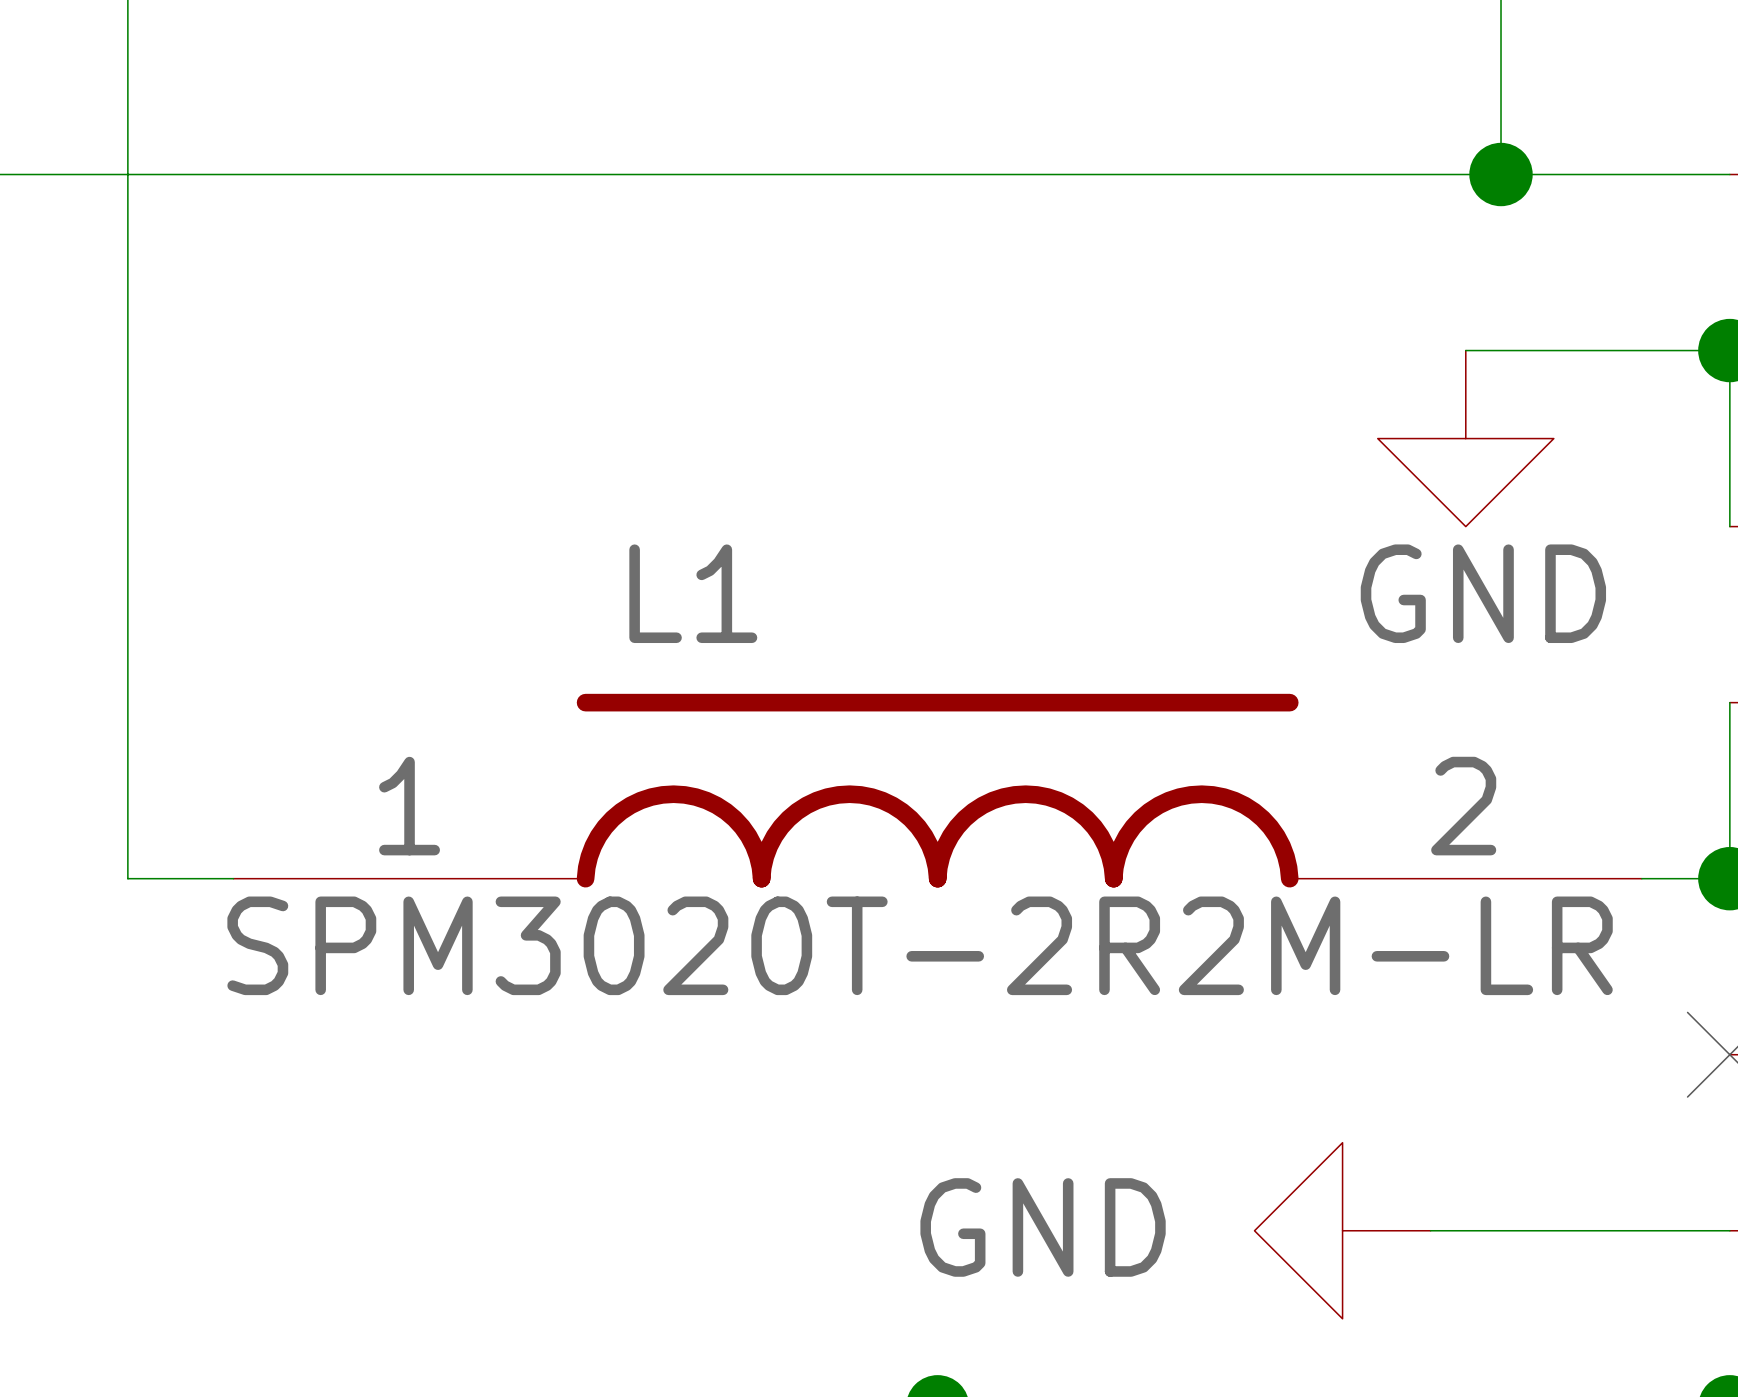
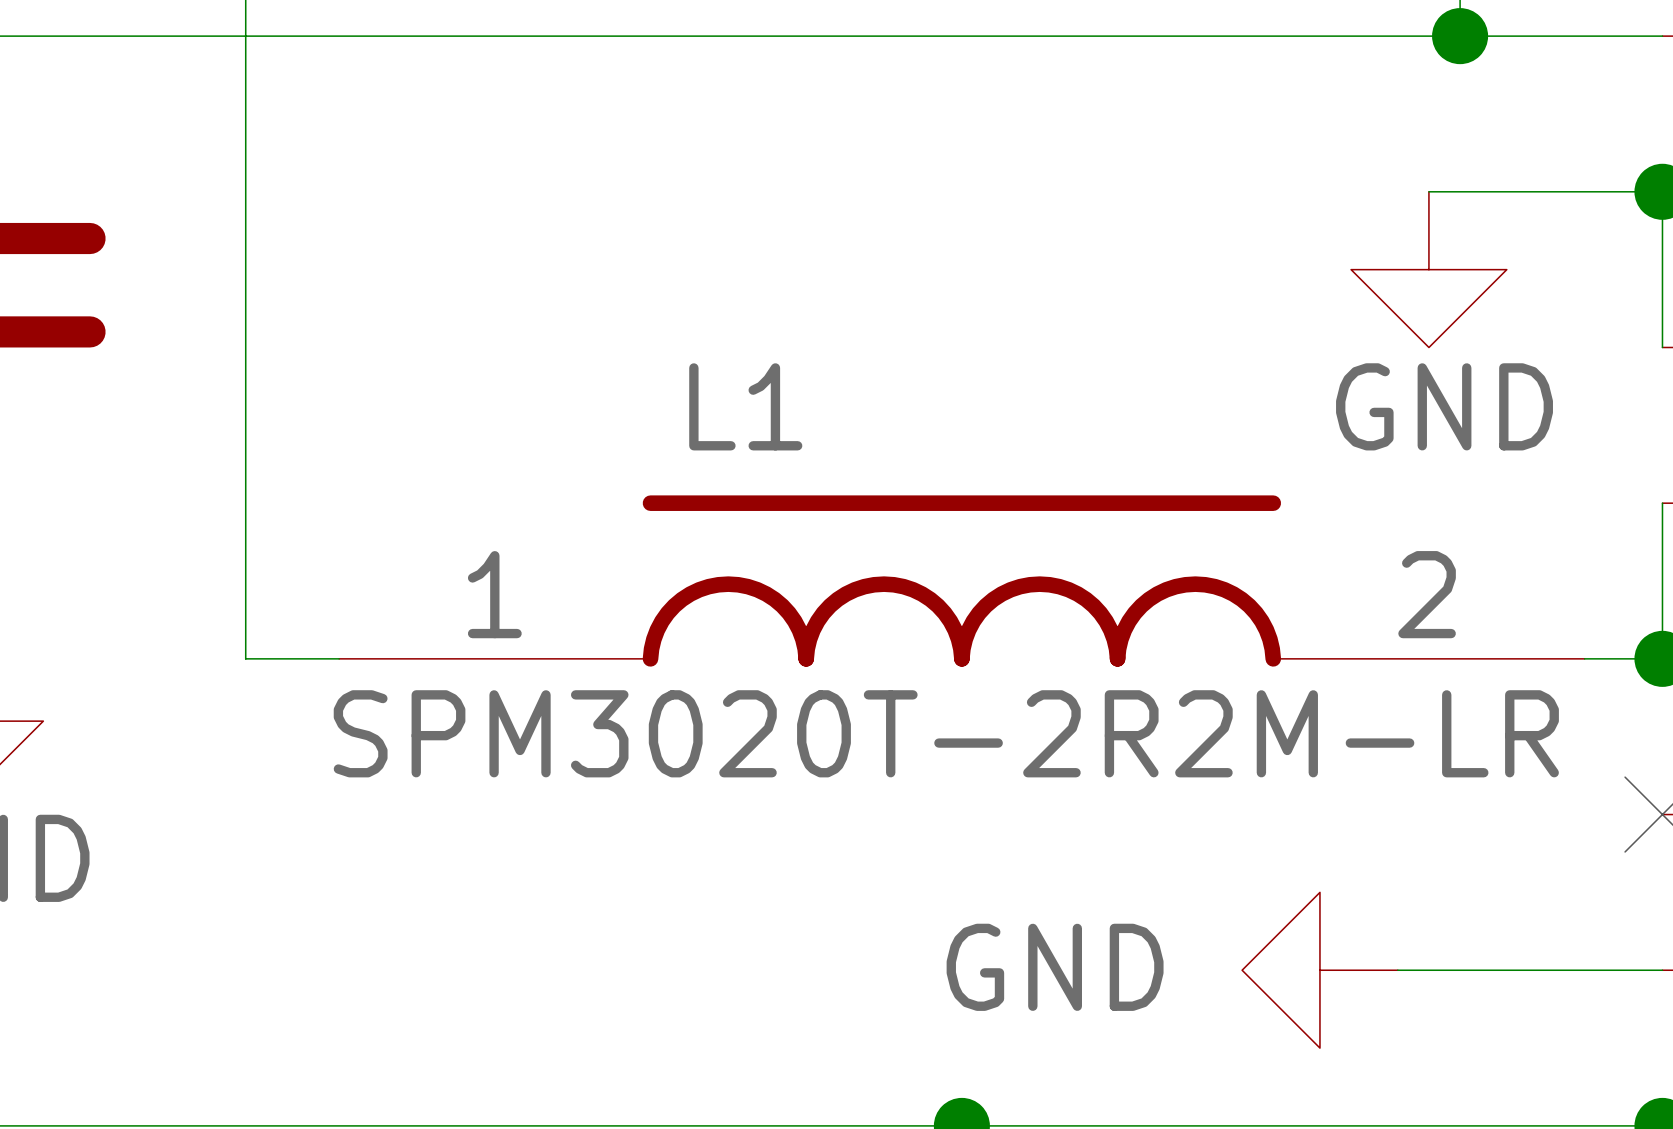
L1 value position: SPM3020T-2R2M-LR (920, 945) -> SPM3020T-2R2M-LR (946, 733)

